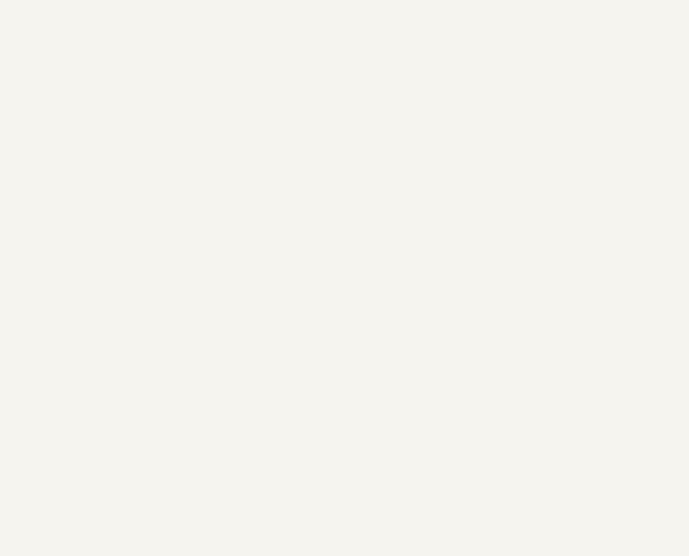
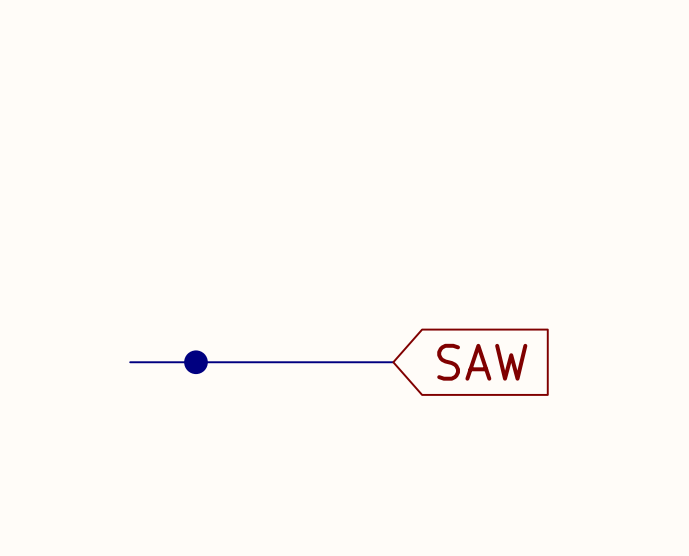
wire: none -> (130, 362) (393, 362)
junction: none -> (195, 362)
global label: none -> SAW (482, 362)

